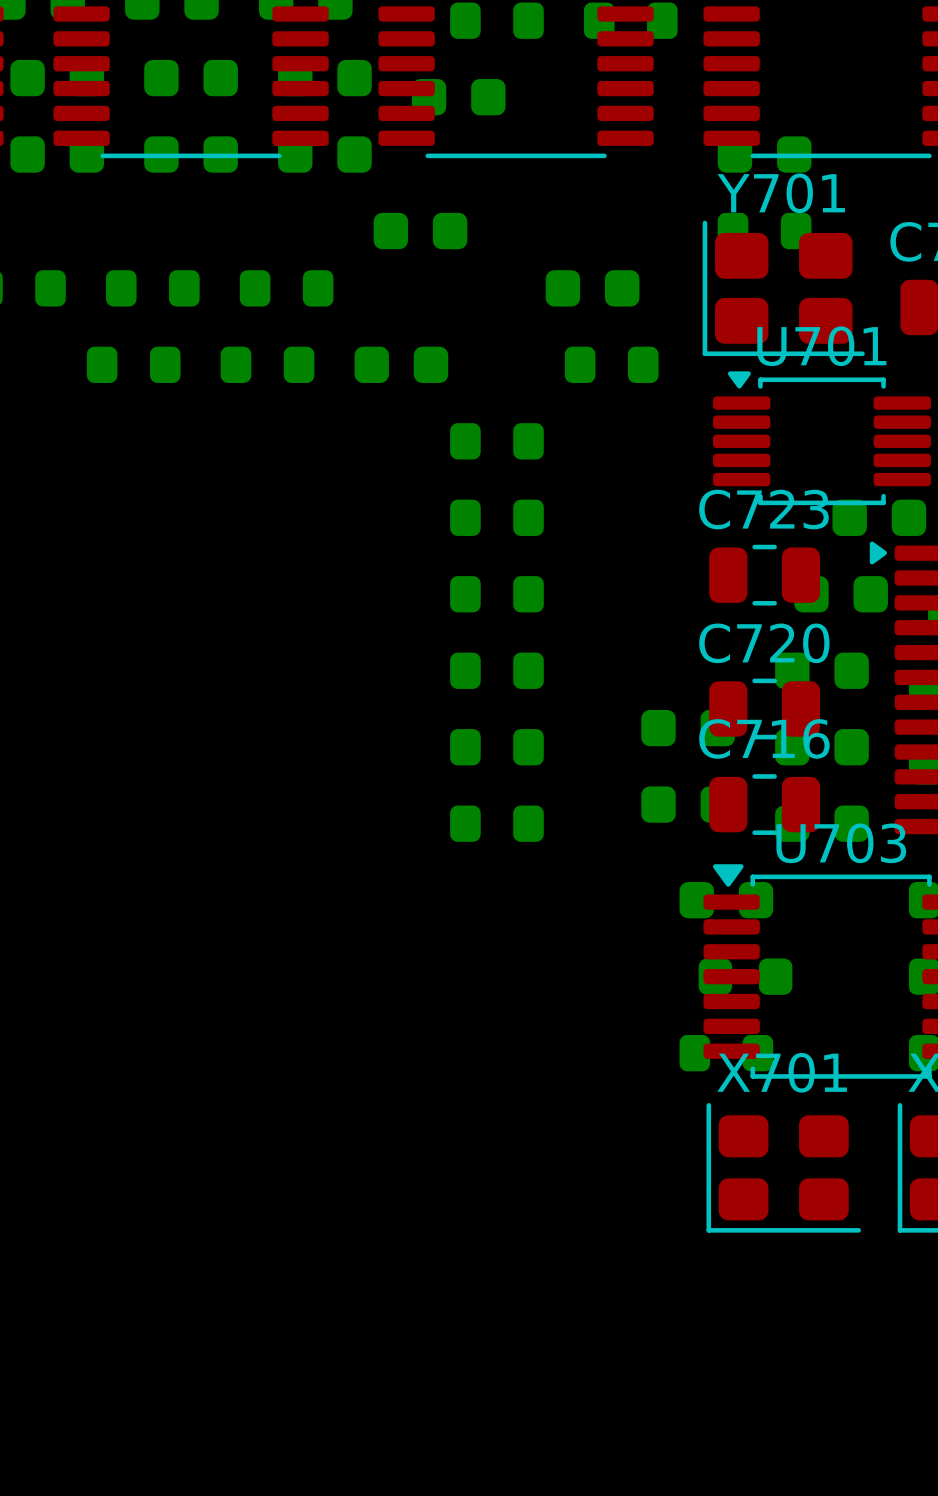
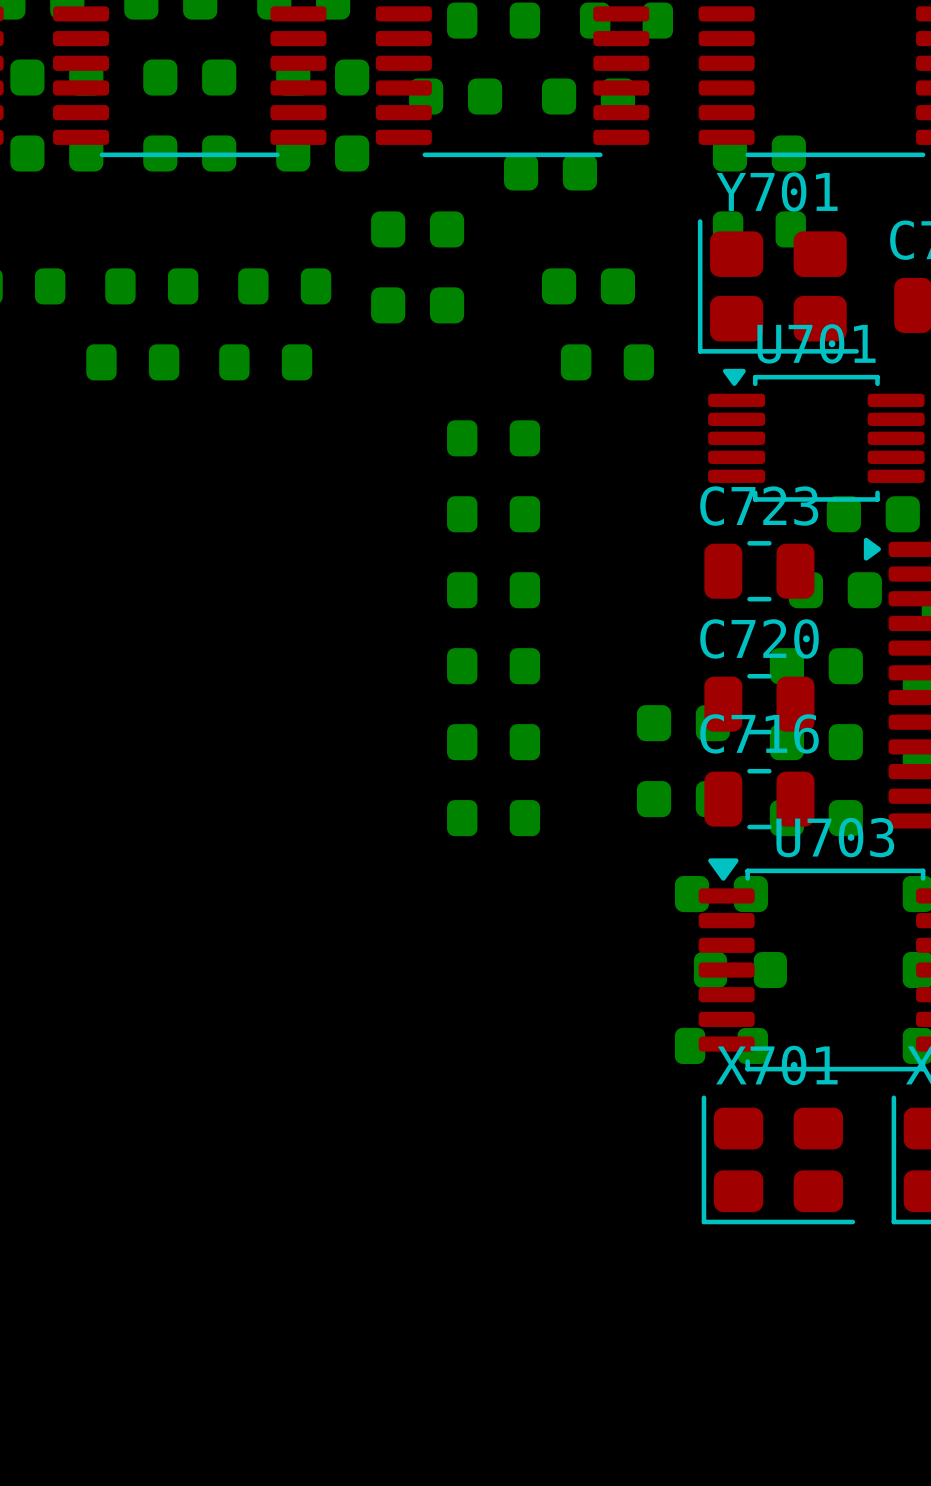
part: none -> (588, 96)
part: none -> (550, 172)
part position: (401, 364) -> (417, 305)

